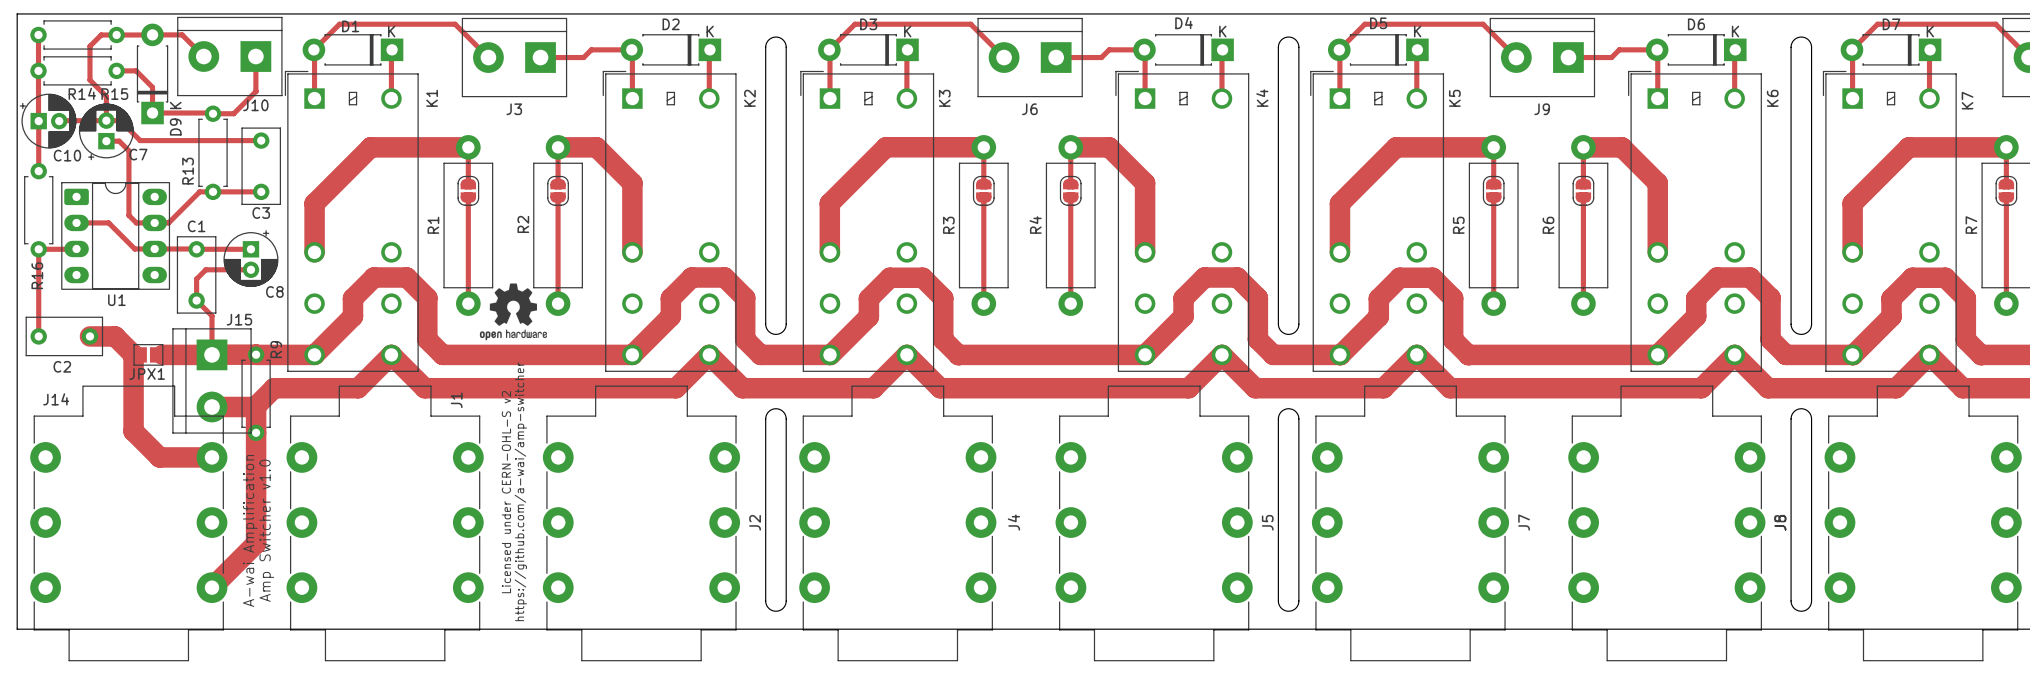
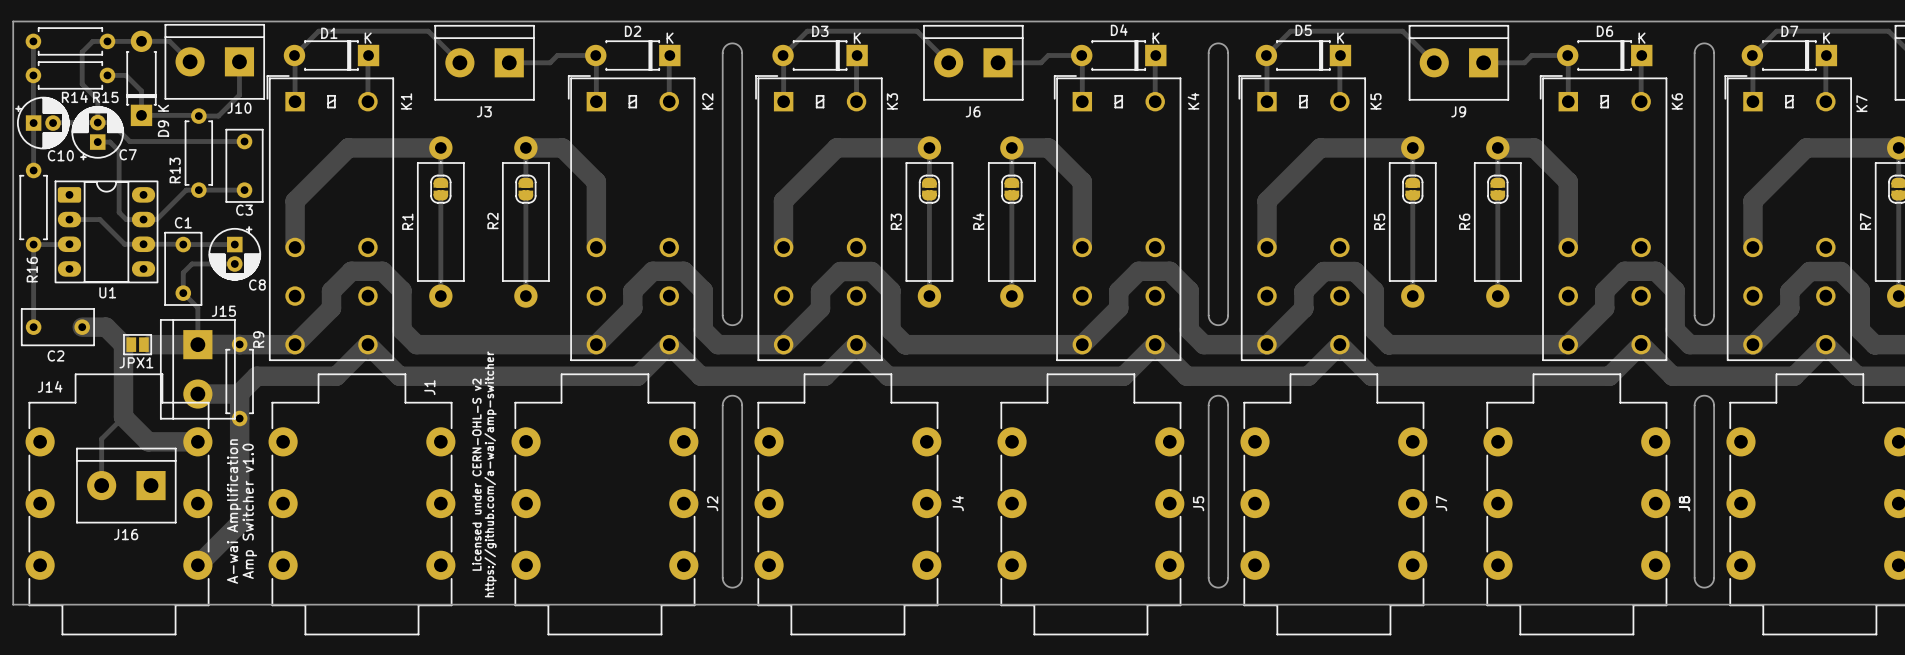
drawing: [479, 283, 547, 341] -> none
track: none -> (123, 417) (101, 438) (101, 485)
J16: none -> (126, 485)

